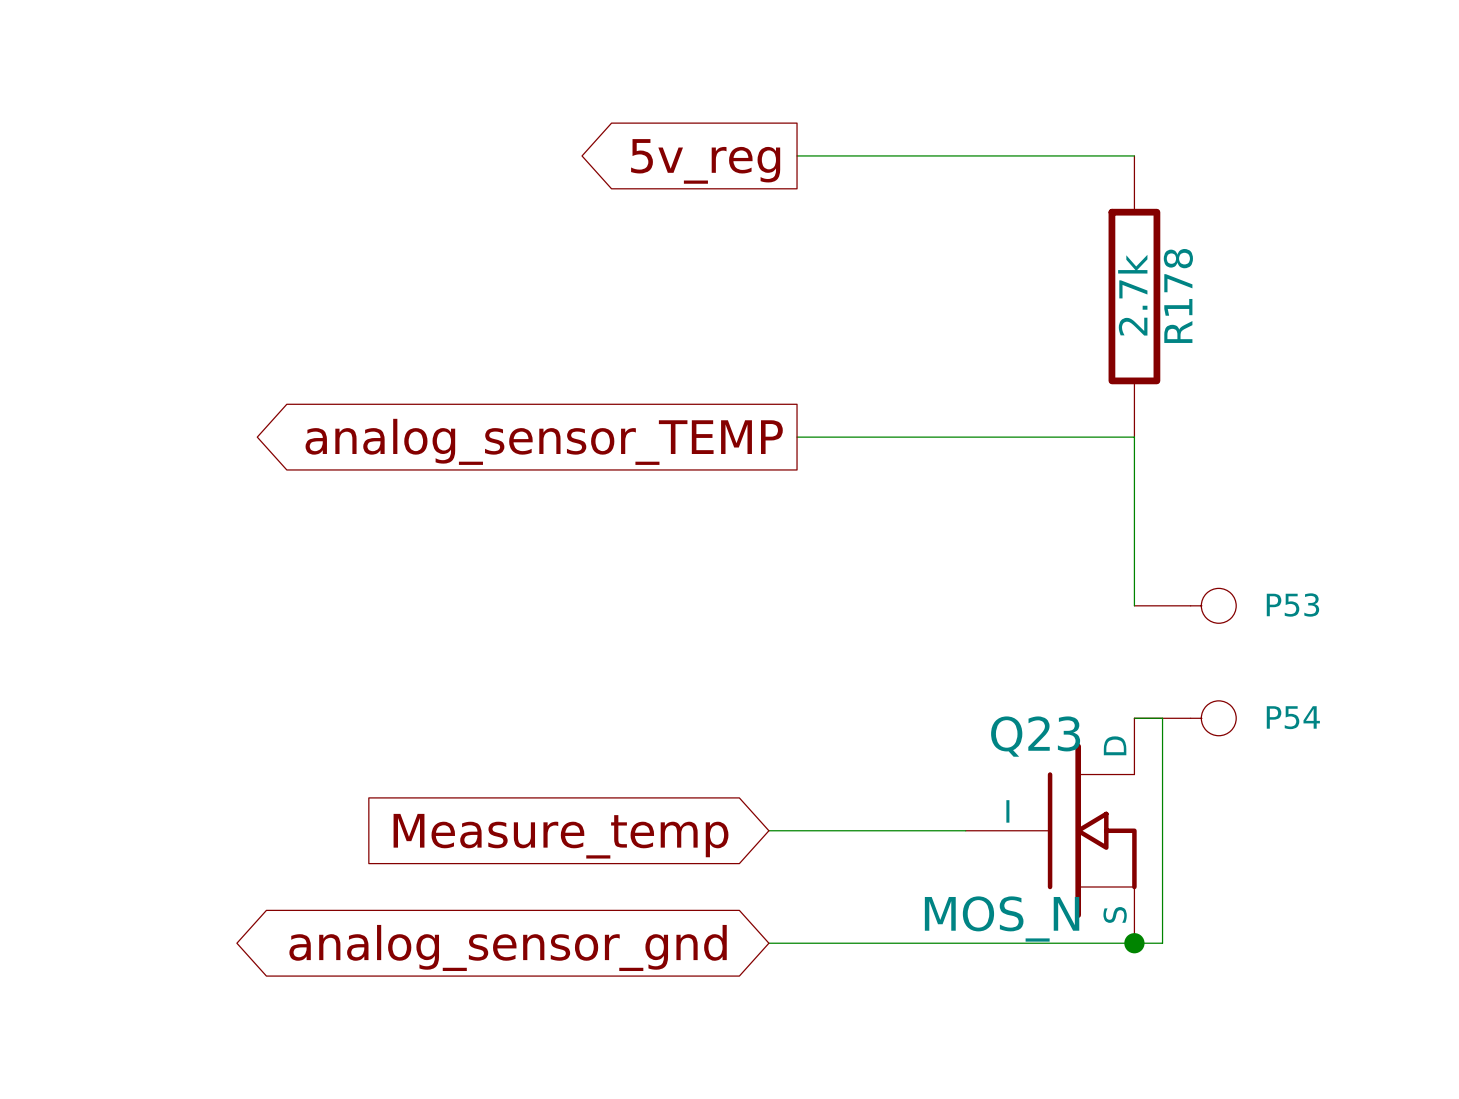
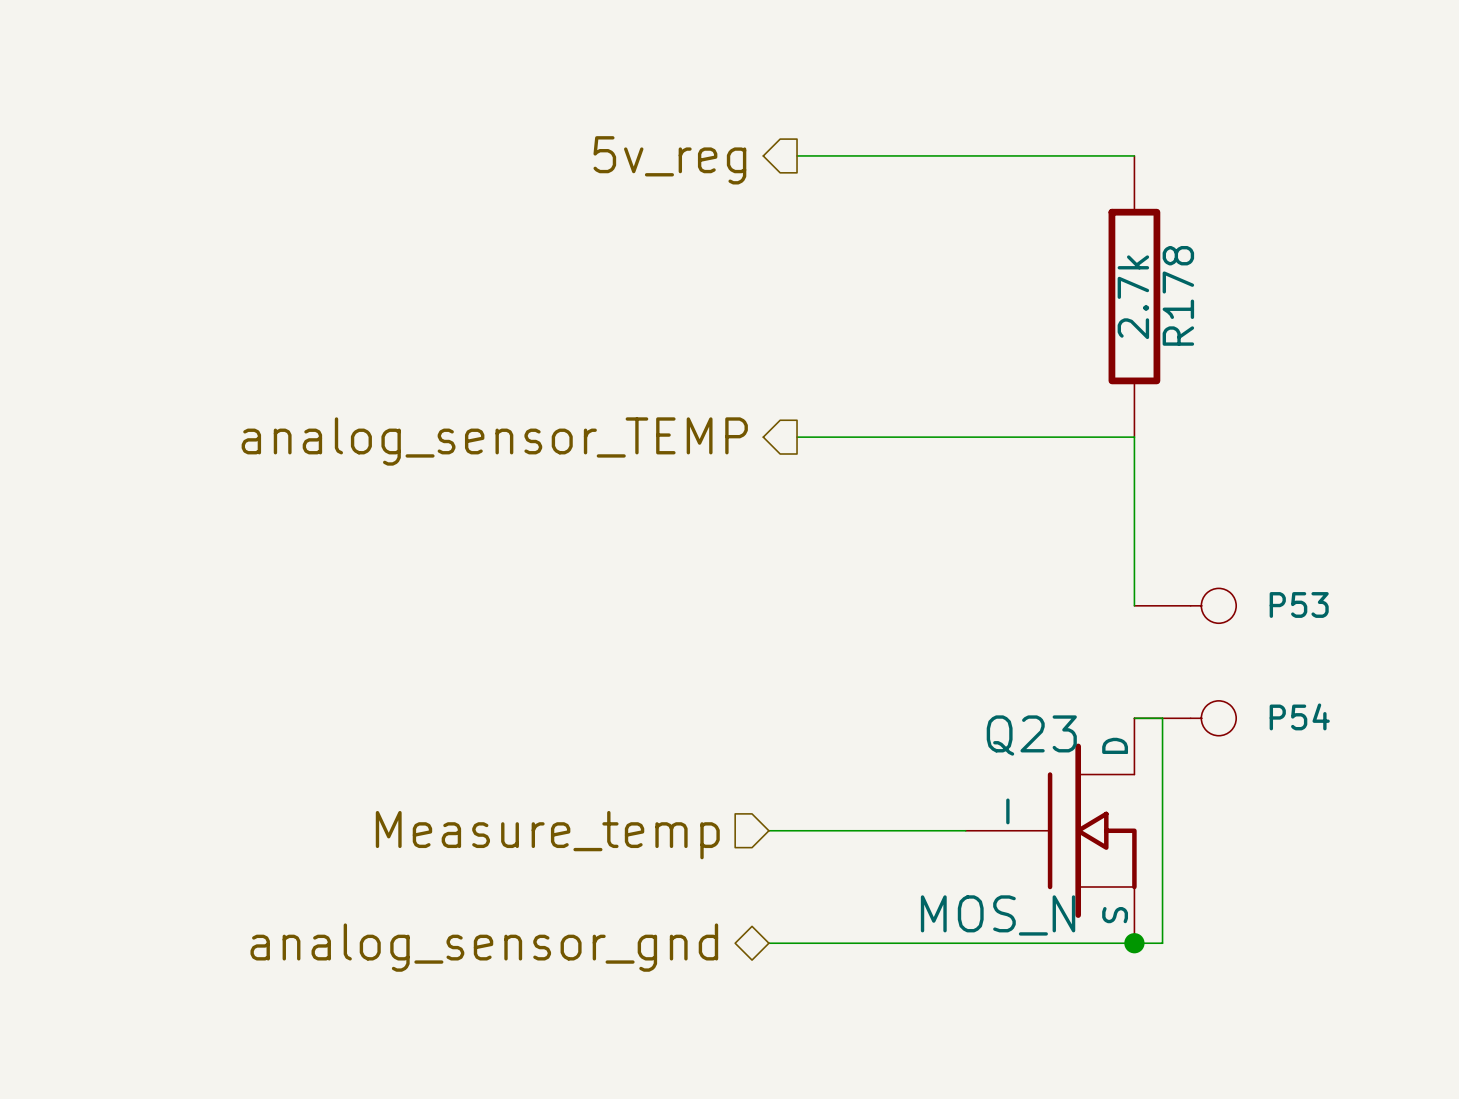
hierarchical label: none -> 5v_reg (669, 160)
global label: 5v_reg (705, 161) -> none
hierarchical label: none -> analog_sensor_TEMP (494, 441)
global label: analog_sensor_TEMP (544, 441) -> none
hierarchical label: none -> Measure_temp (547, 835)
global label: Measure_temp (560, 836) -> none
hierarchical label: none -> analog_sensor_gnd (484, 947)
global label: analog_sensor_gnd (508, 947) -> none

